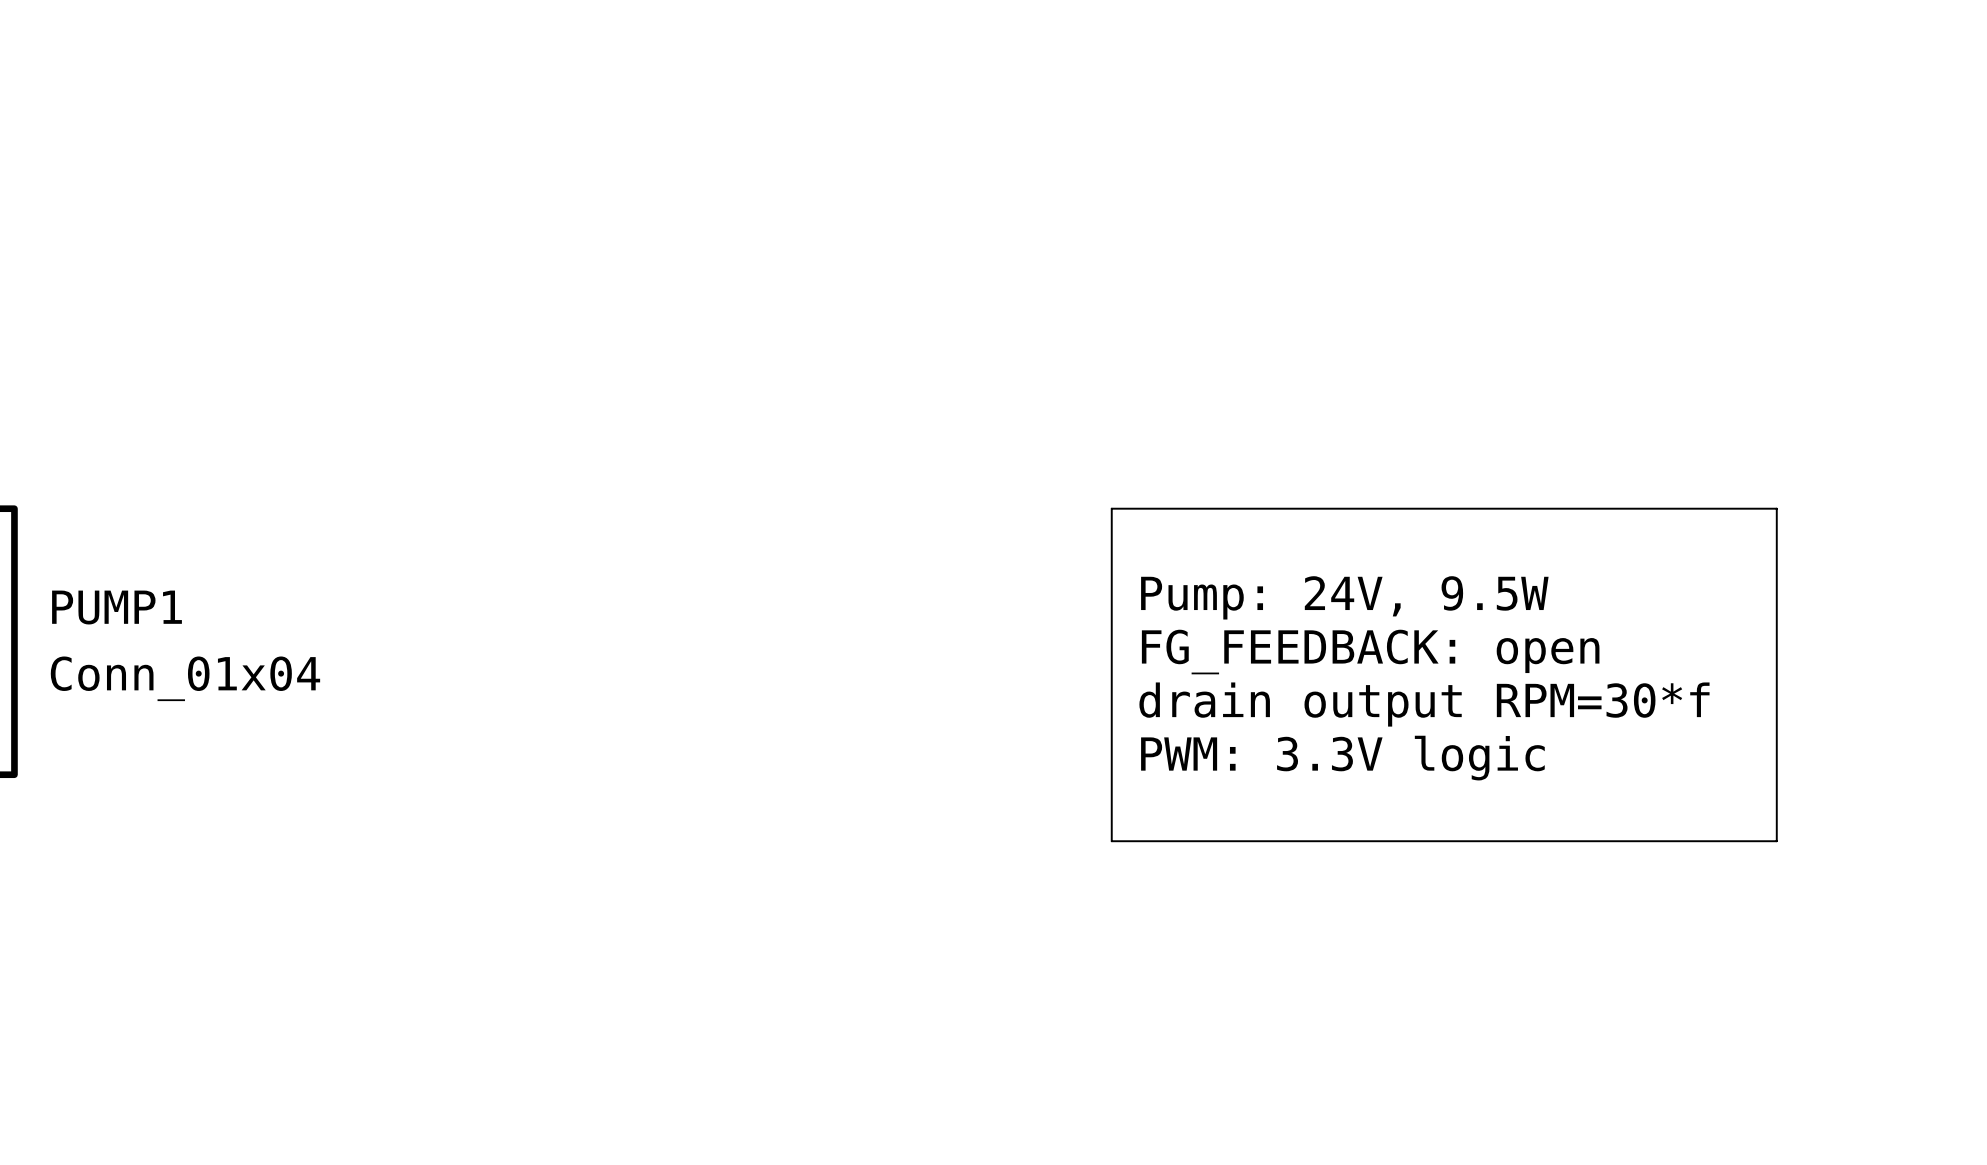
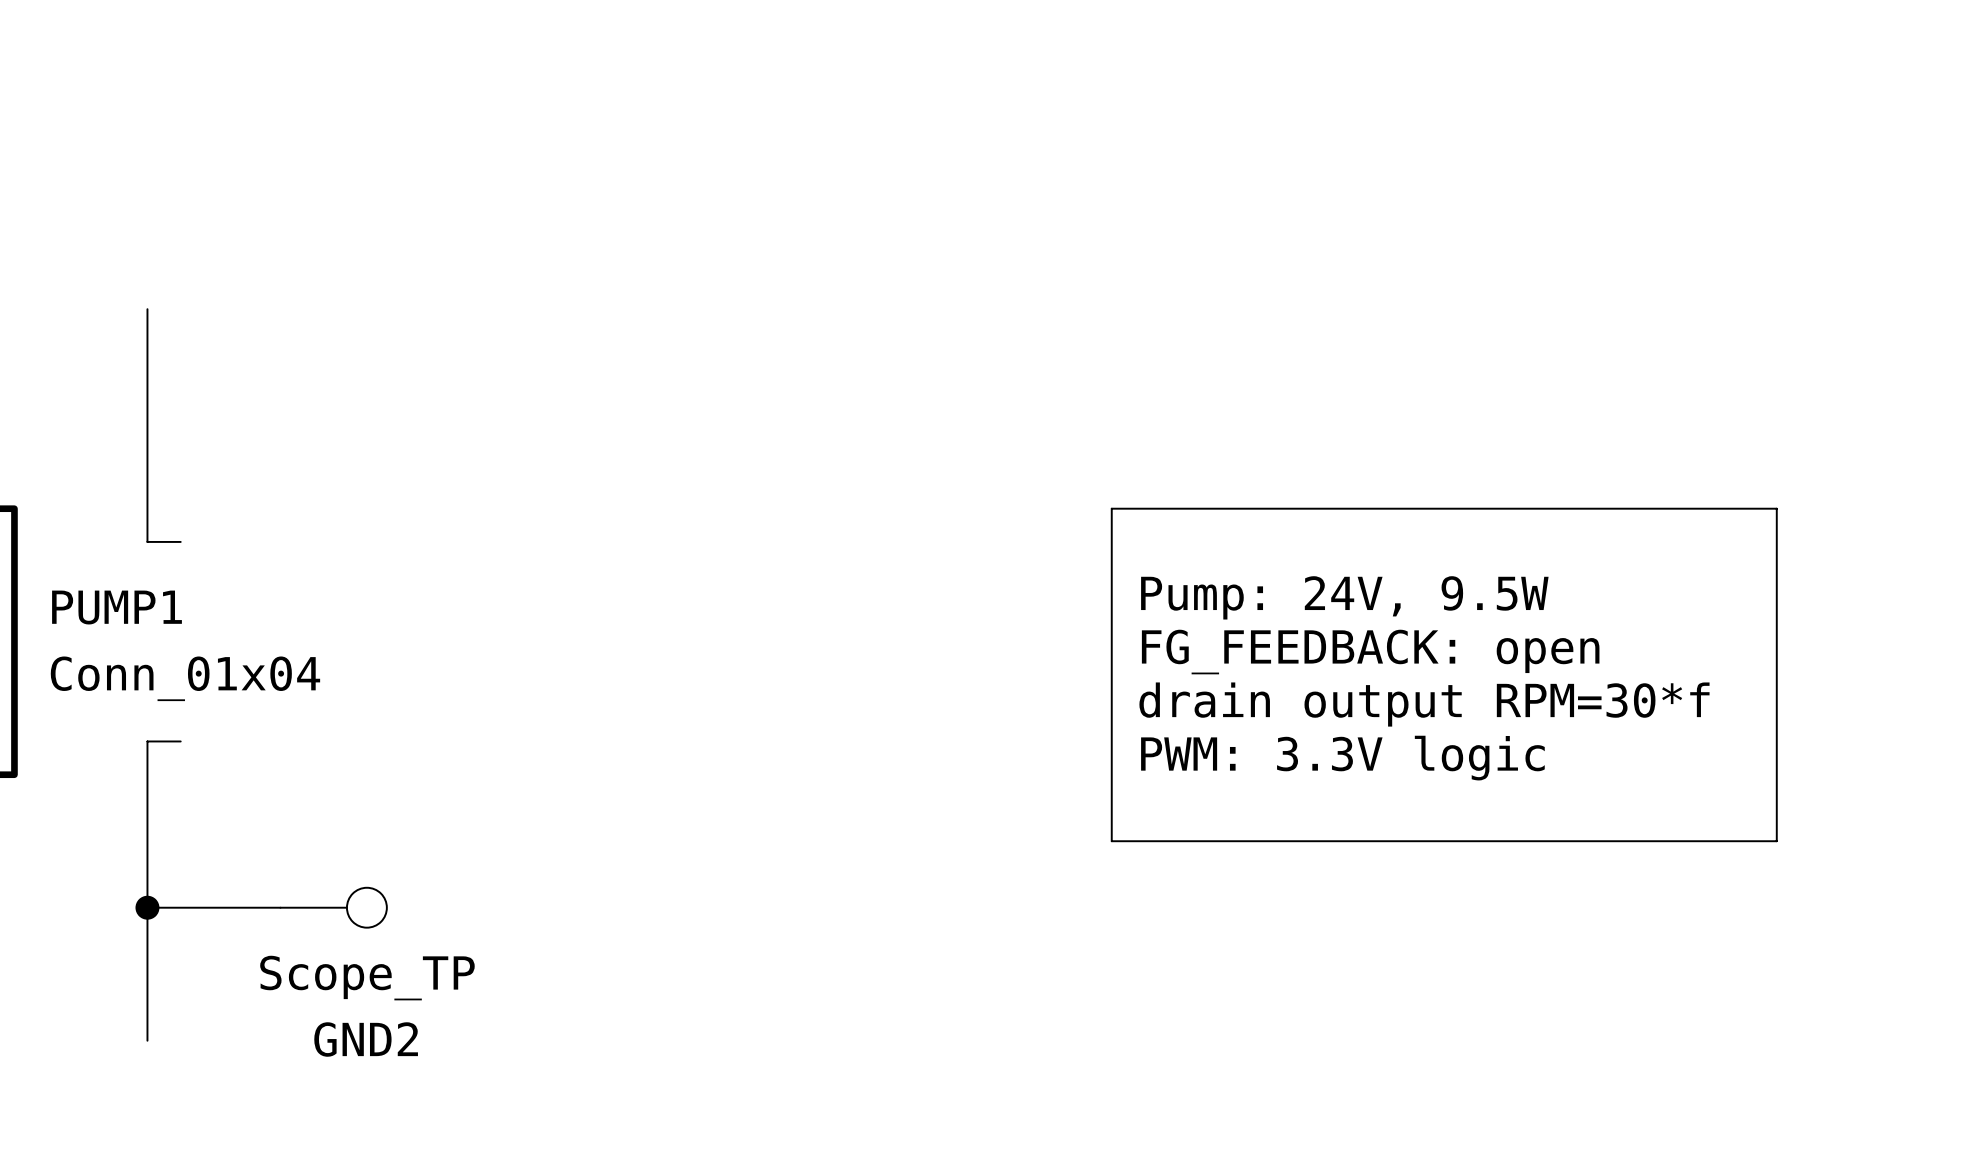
wire: none -> (147, 309) (147, 541) (180, 541)
wire: none -> (180, 741) (147, 741) (147, 1040)
wire: none -> (147, 907) (280, 907)
junction: none -> (147, 907)
GND2: none -> Scope_TP (333, 907)

